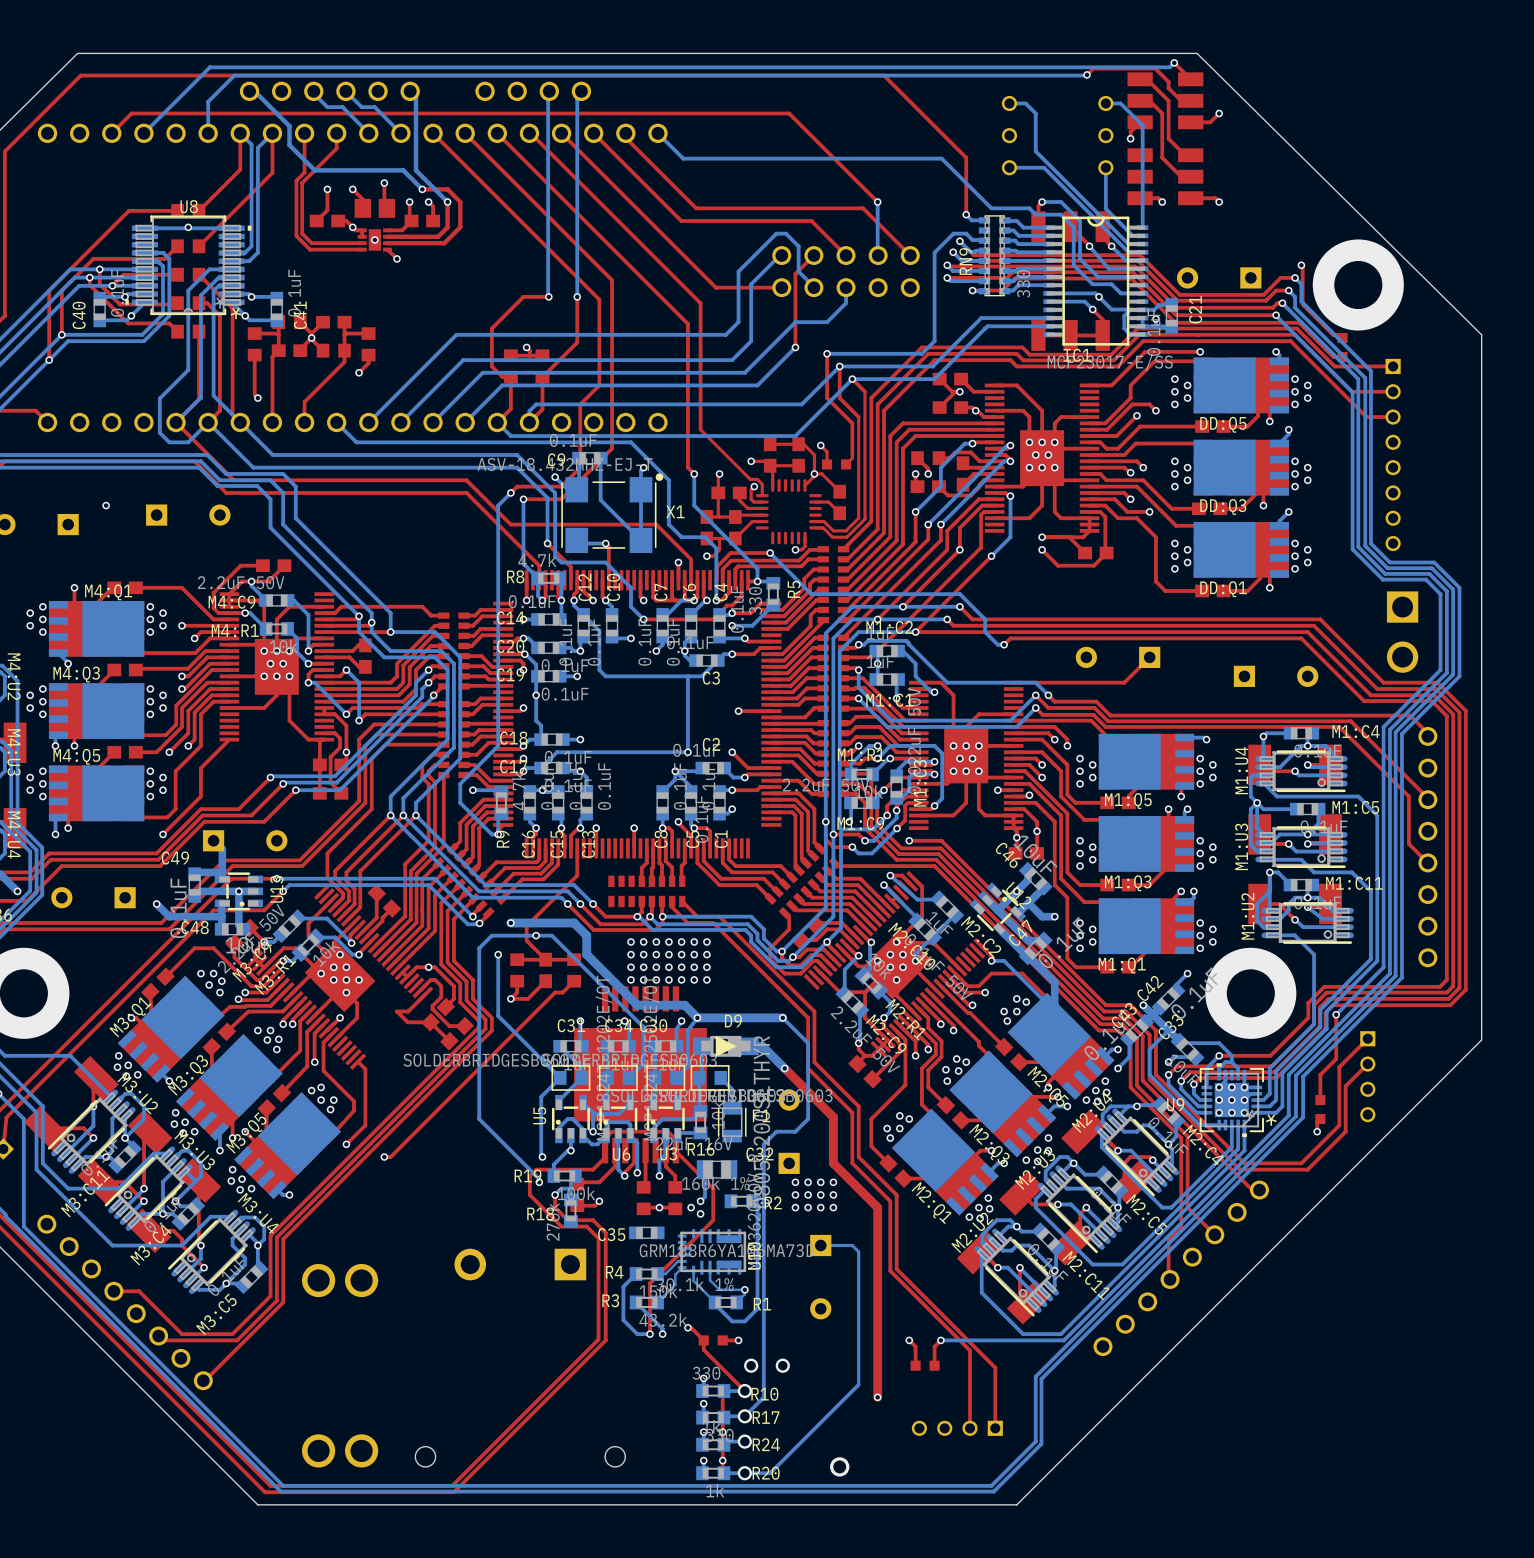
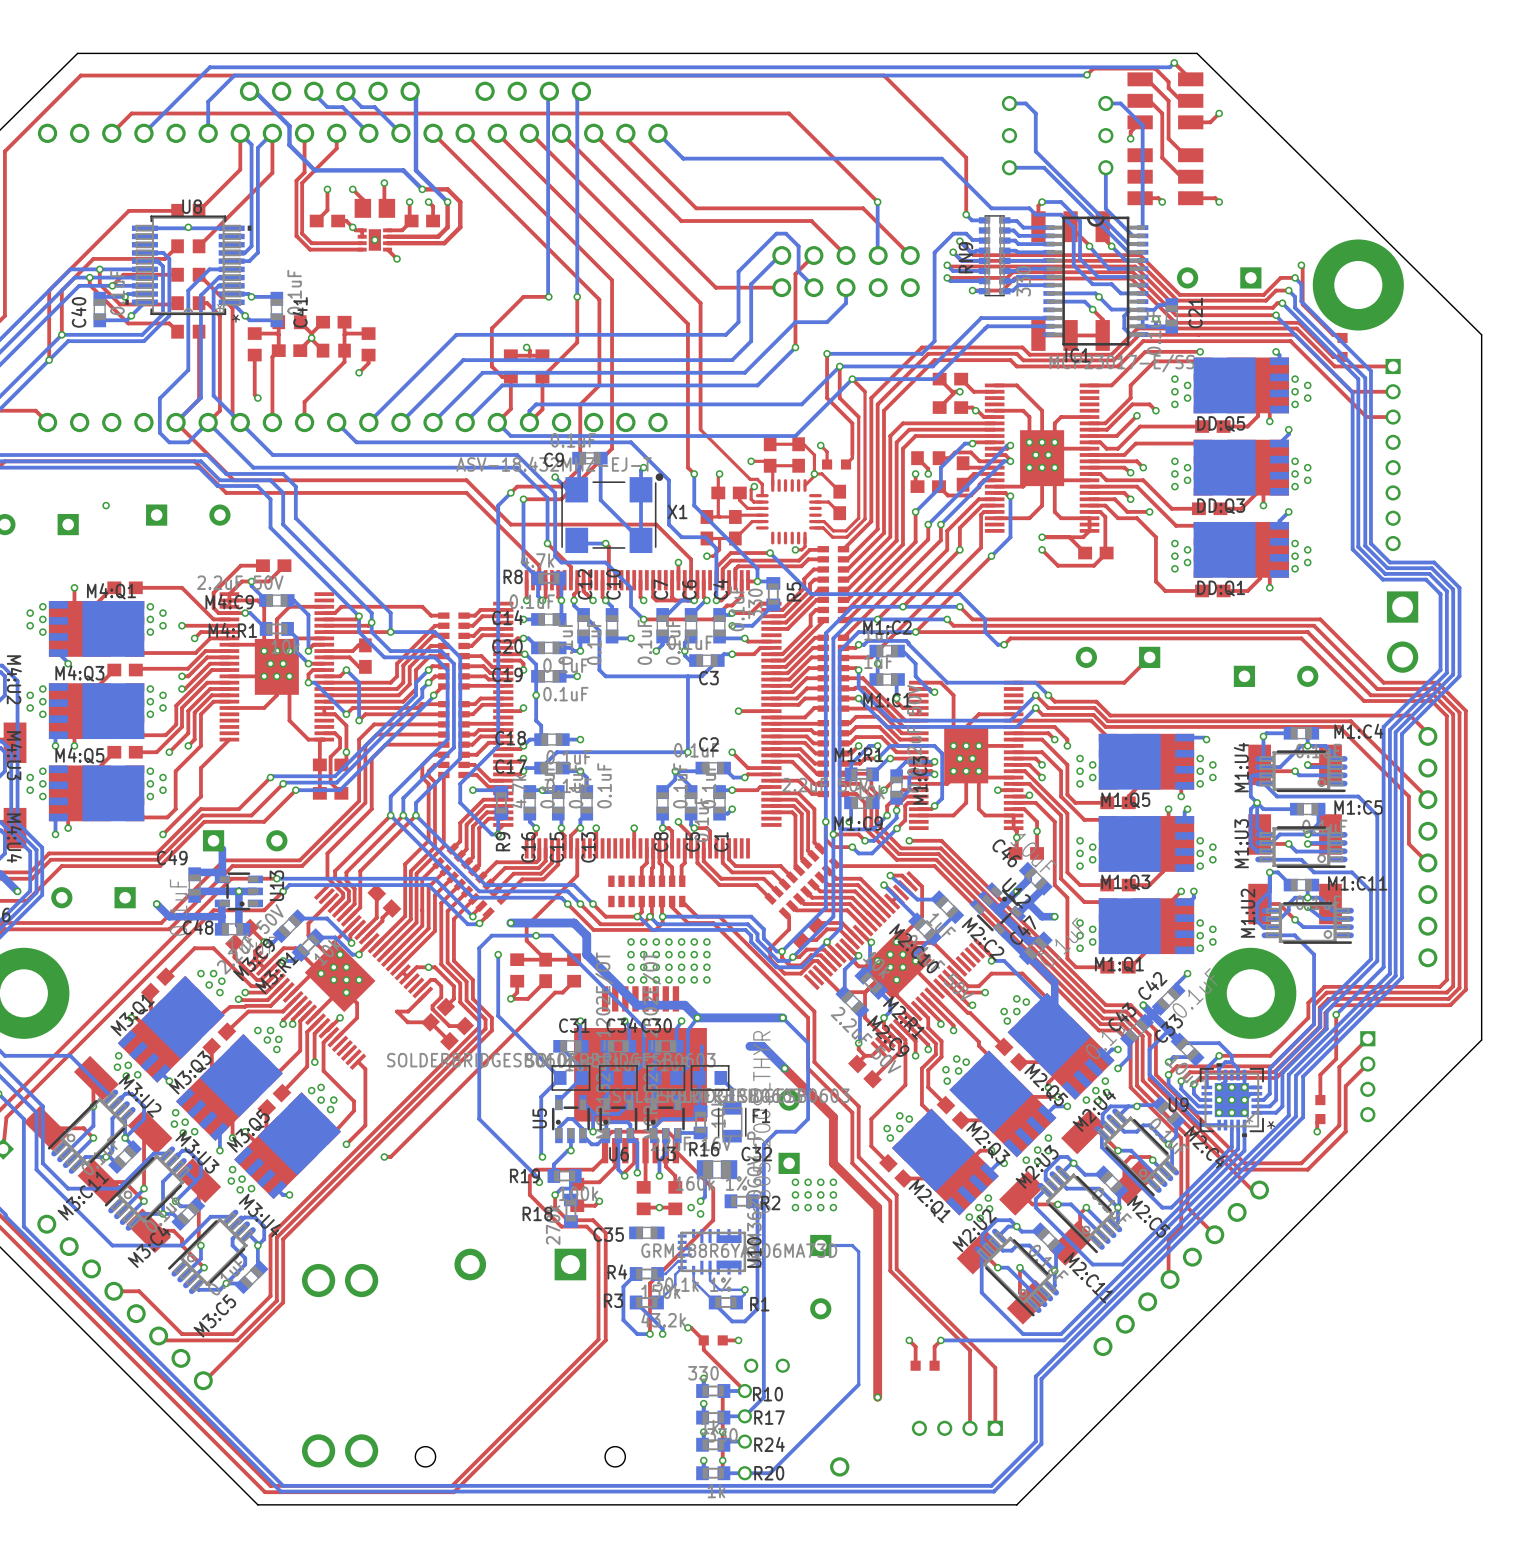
D9: (725, 1046) -> none

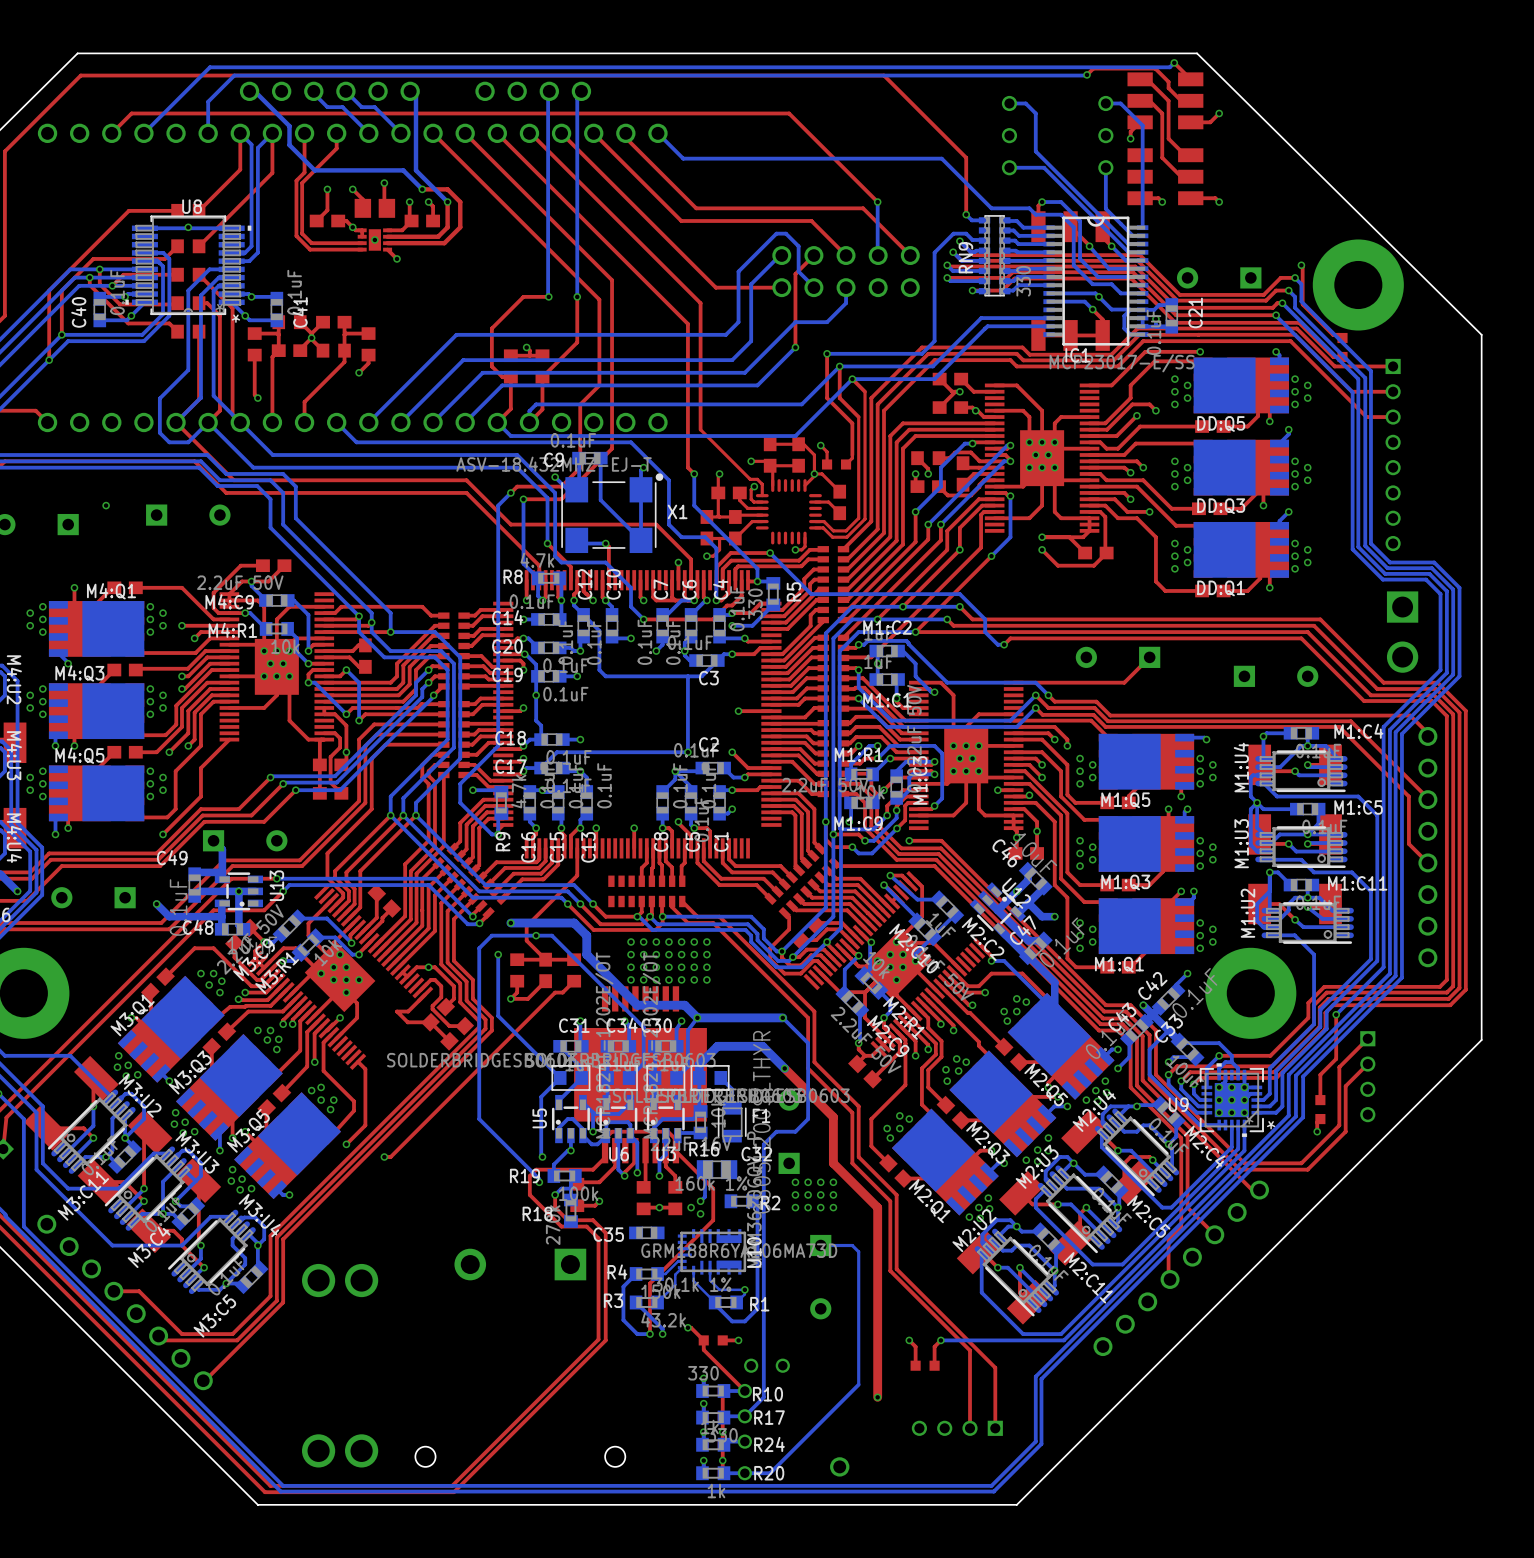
bottom track: (701, 1046) (701, 1075) (699, 1077) -> (749, 1046) (717, 1046) (699, 1064) (699, 1077)

